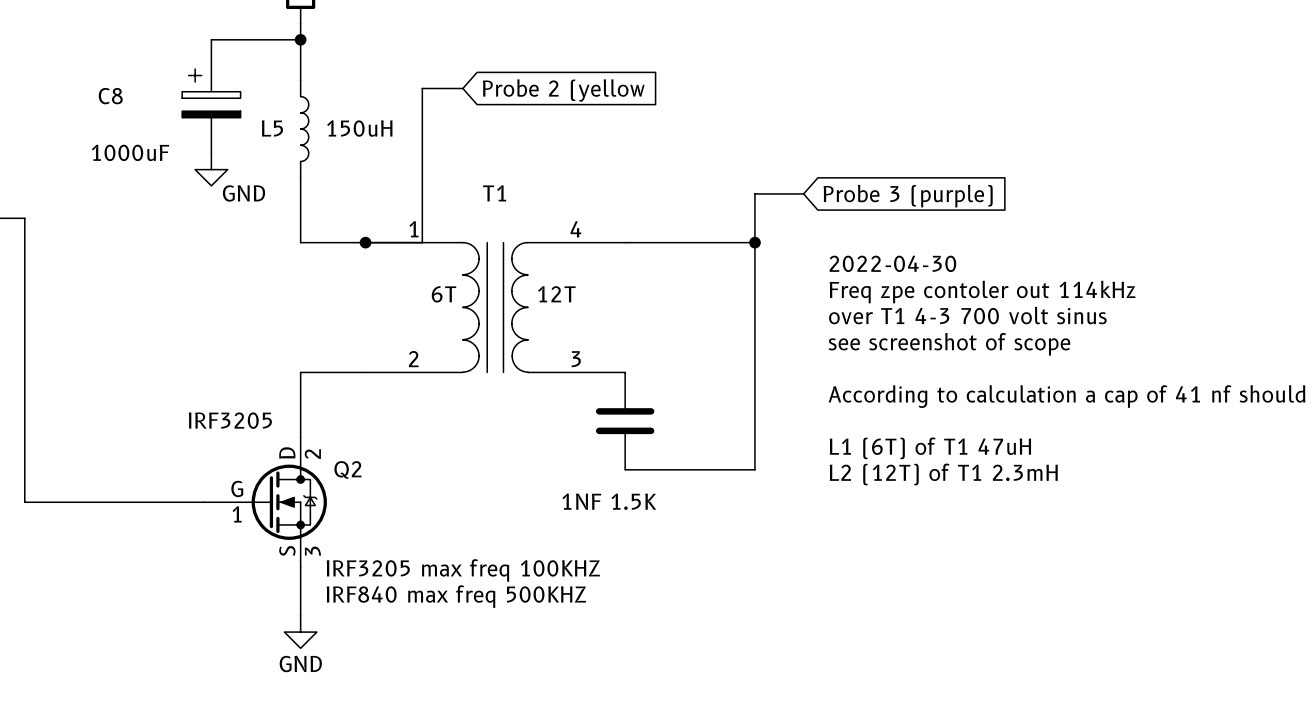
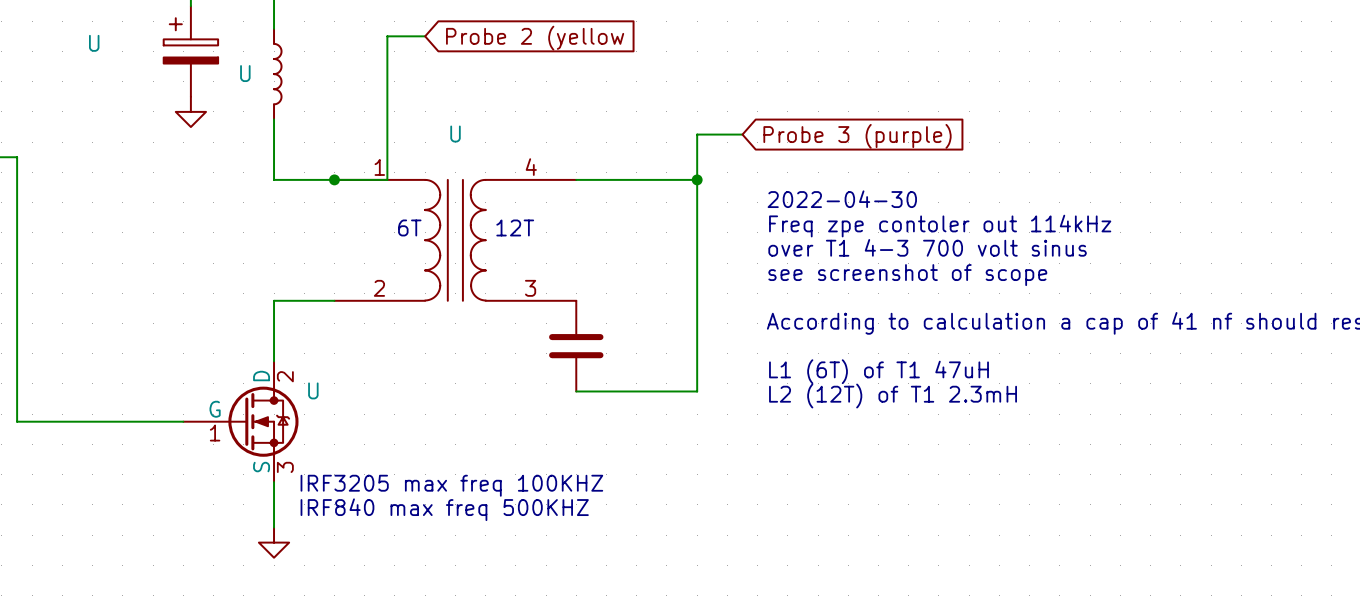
C8 name: C8 (110, 96) -> U (94, 43)
L5 name: L5 (272, 128) -> U (245, 73)
L5 value: 150uH (359, 128) -> none
C8 value: 1000uF (130, 152) -> none
power symbol text: GND (243, 193) -> none
T1 name: T1 (494, 193) -> U (455, 134)
Q2 value: IRF3205 (230, 420) -> none
Q2 name: Q2 (347, 469) -> U (313, 390)
part value: 1NF 1.5K (609, 501) -> none
power symbol text: GND (300, 664) -> none

